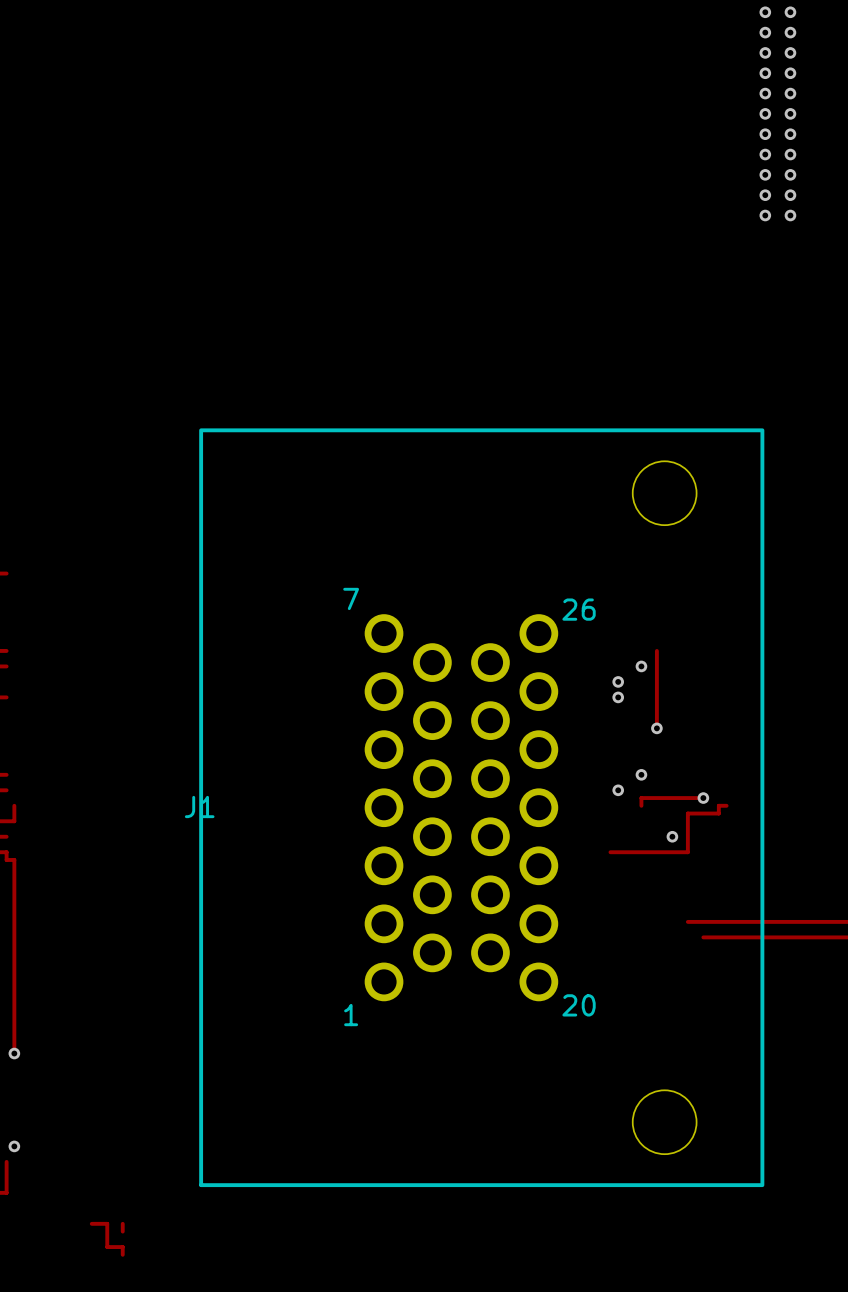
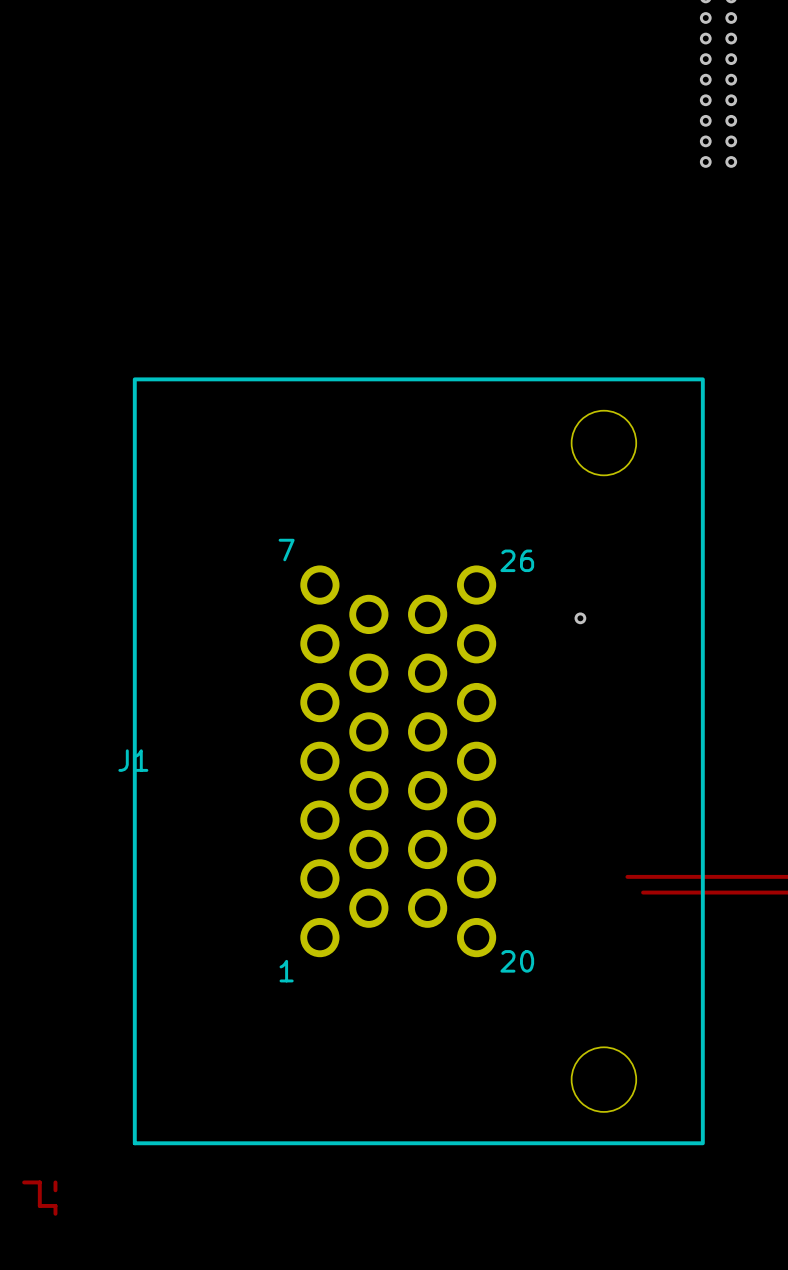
track: (656, 650) (656, 728) -> none
via: (618, 681) -> none
via: (618, 697) -> none
via: (656, 728) -> none
via: (641, 774) -> none
via: (618, 790) -> none
track: (703, 798) (641, 798) (641, 805) -> none
via: (703, 798) -> none
track: (726, 805) (718, 805) (718, 813) (687, 813) (687, 852) (610, 852) -> none
via: (672, 836) -> none

